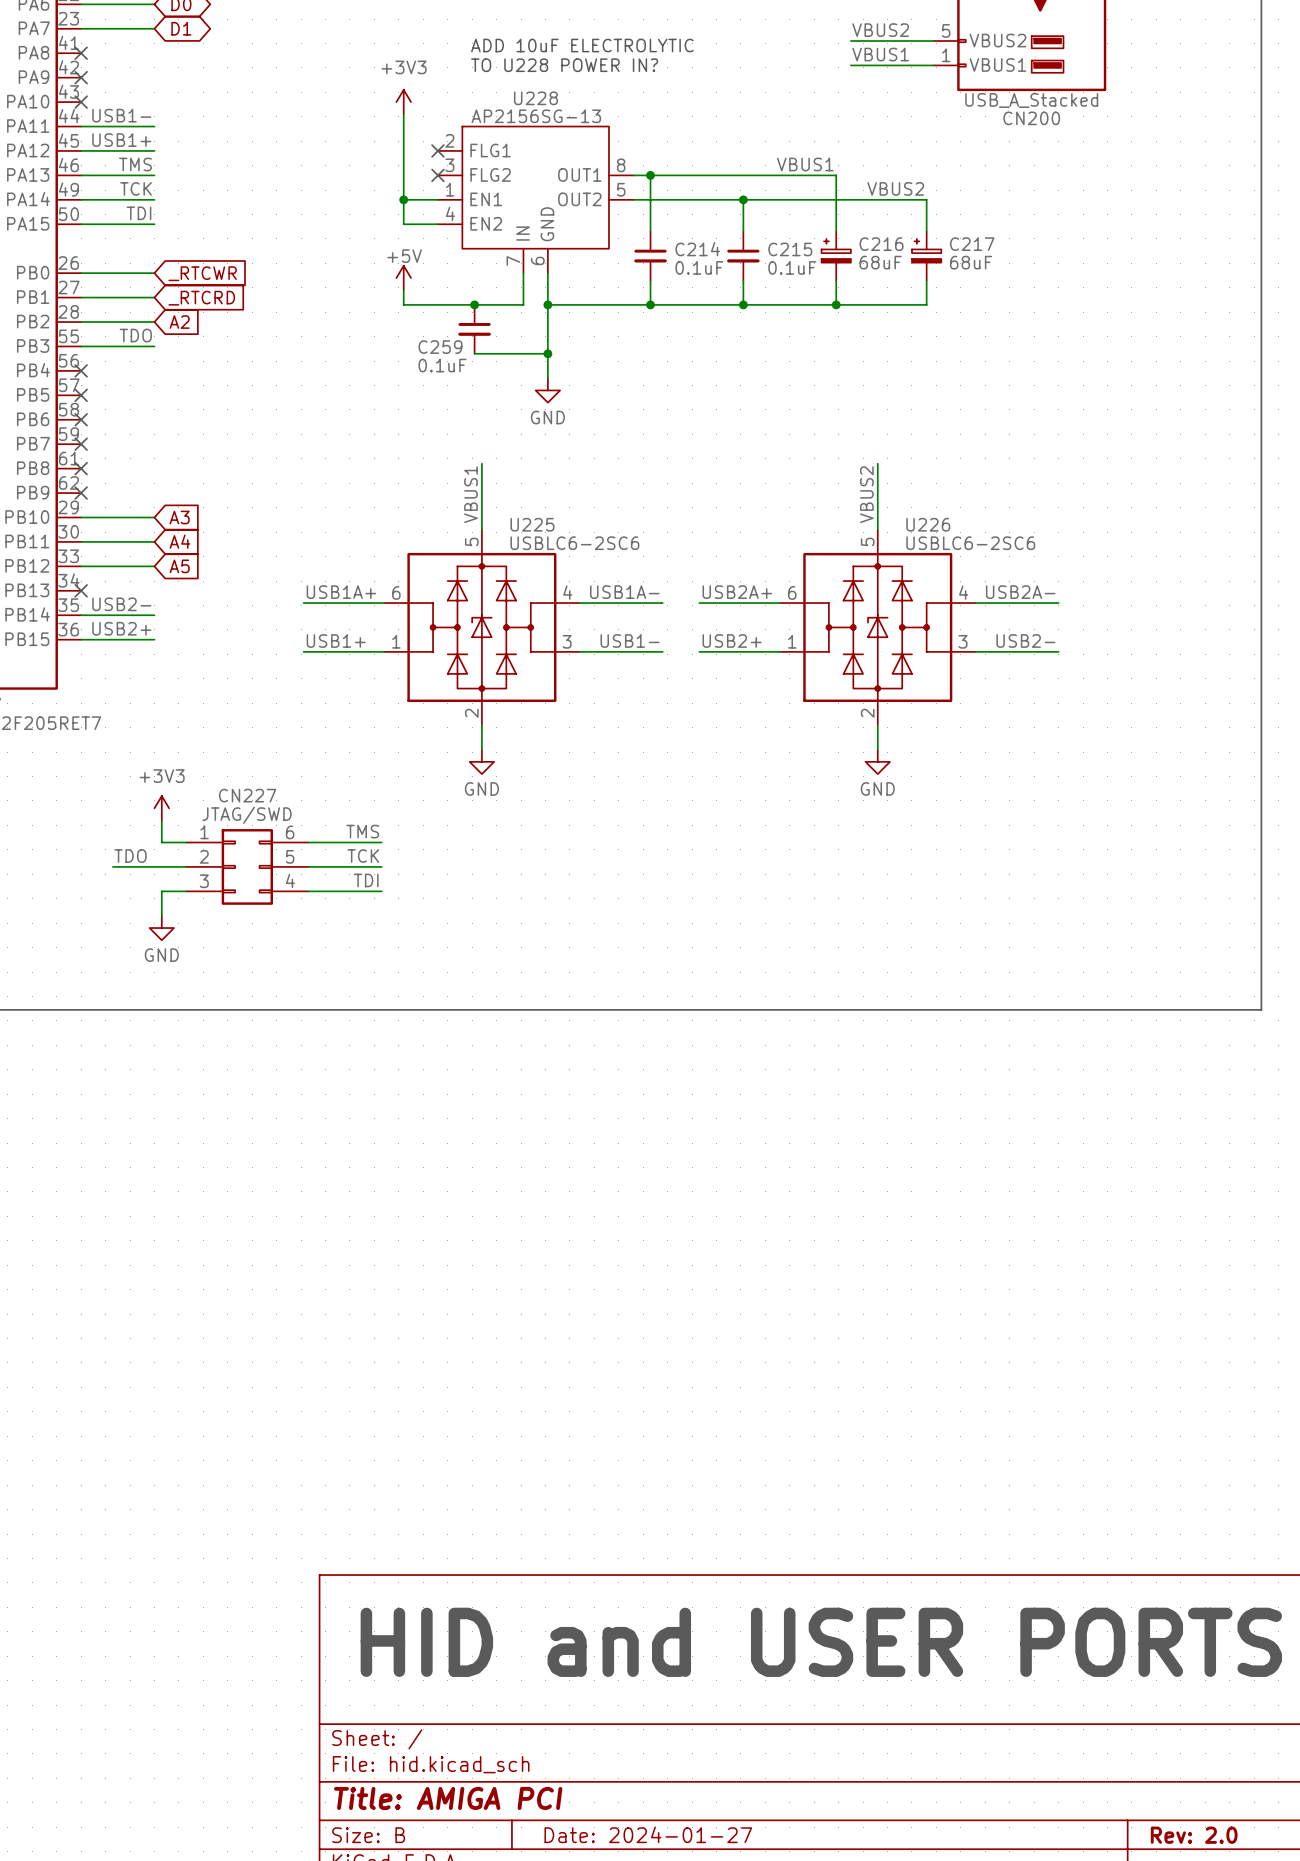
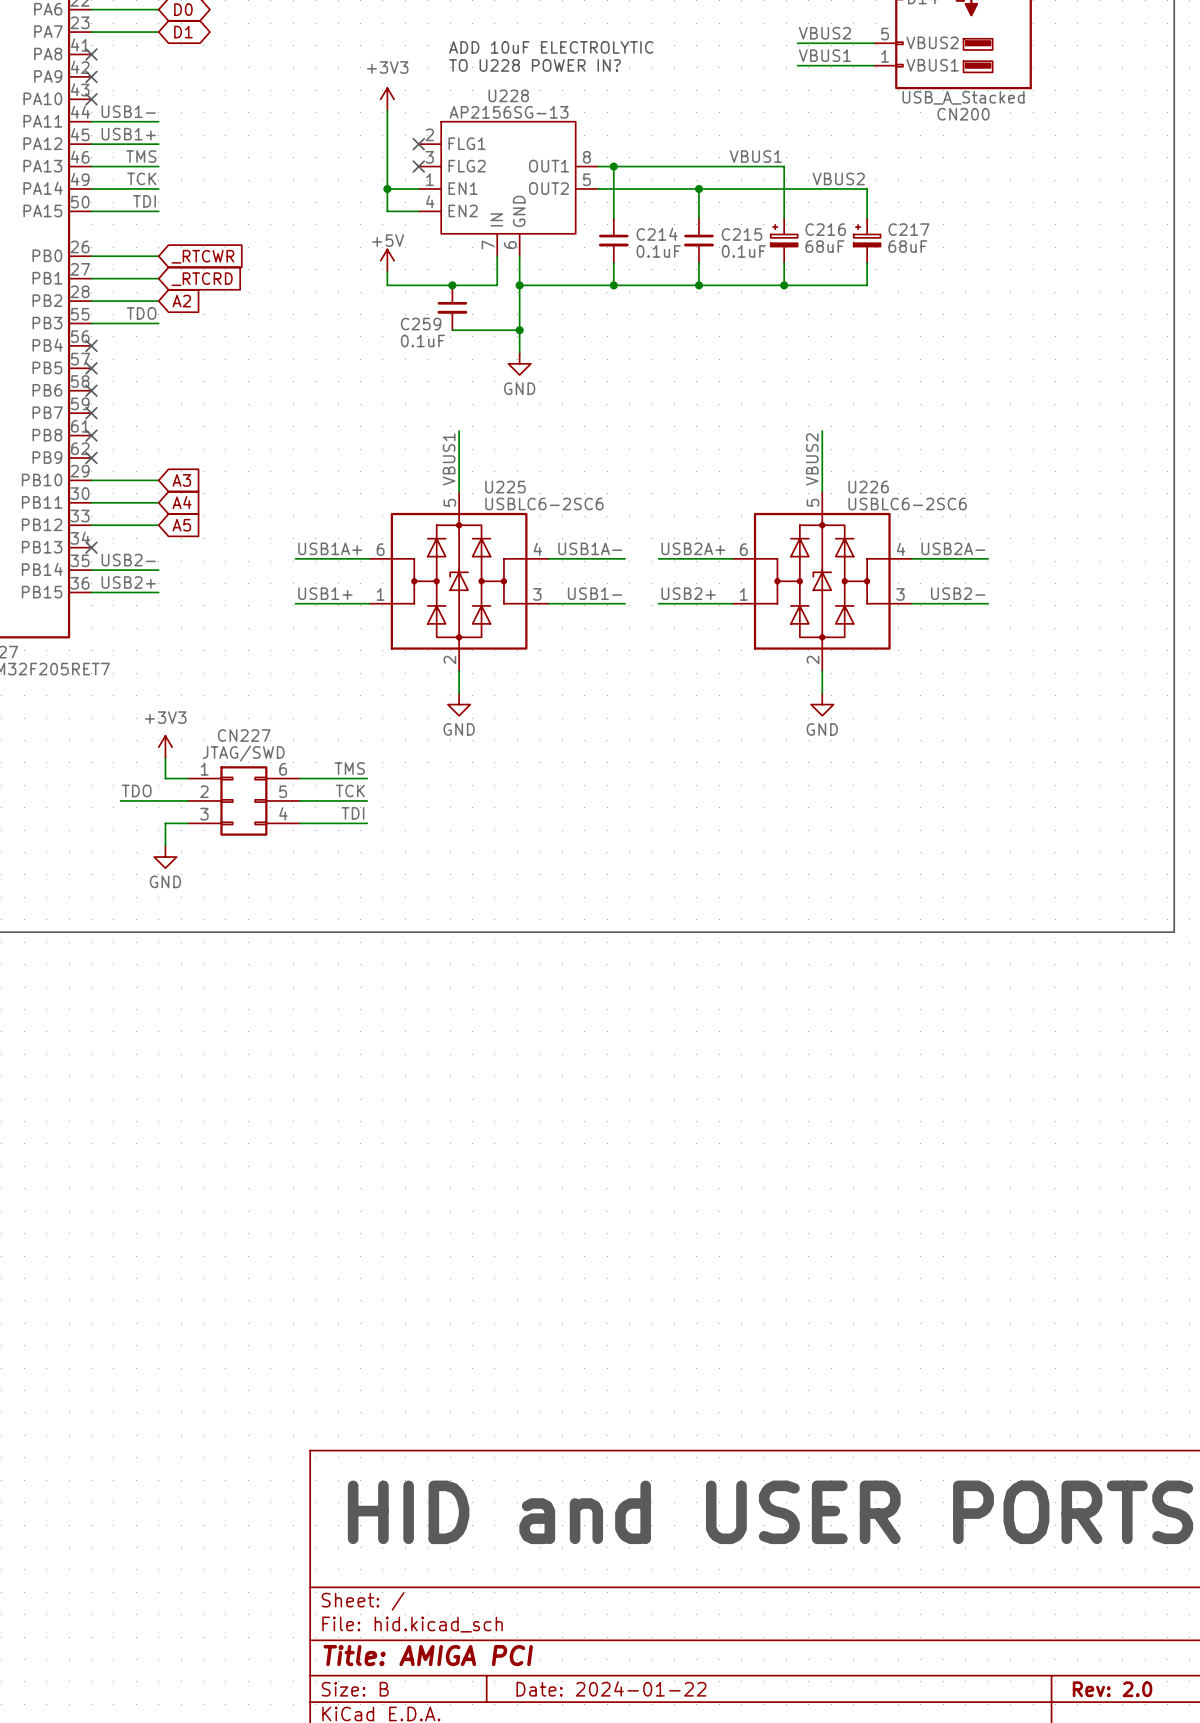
title block: Date: 2024-01-27 (648, 1834) -> Date: 2024-01-22 (611, 1688)

